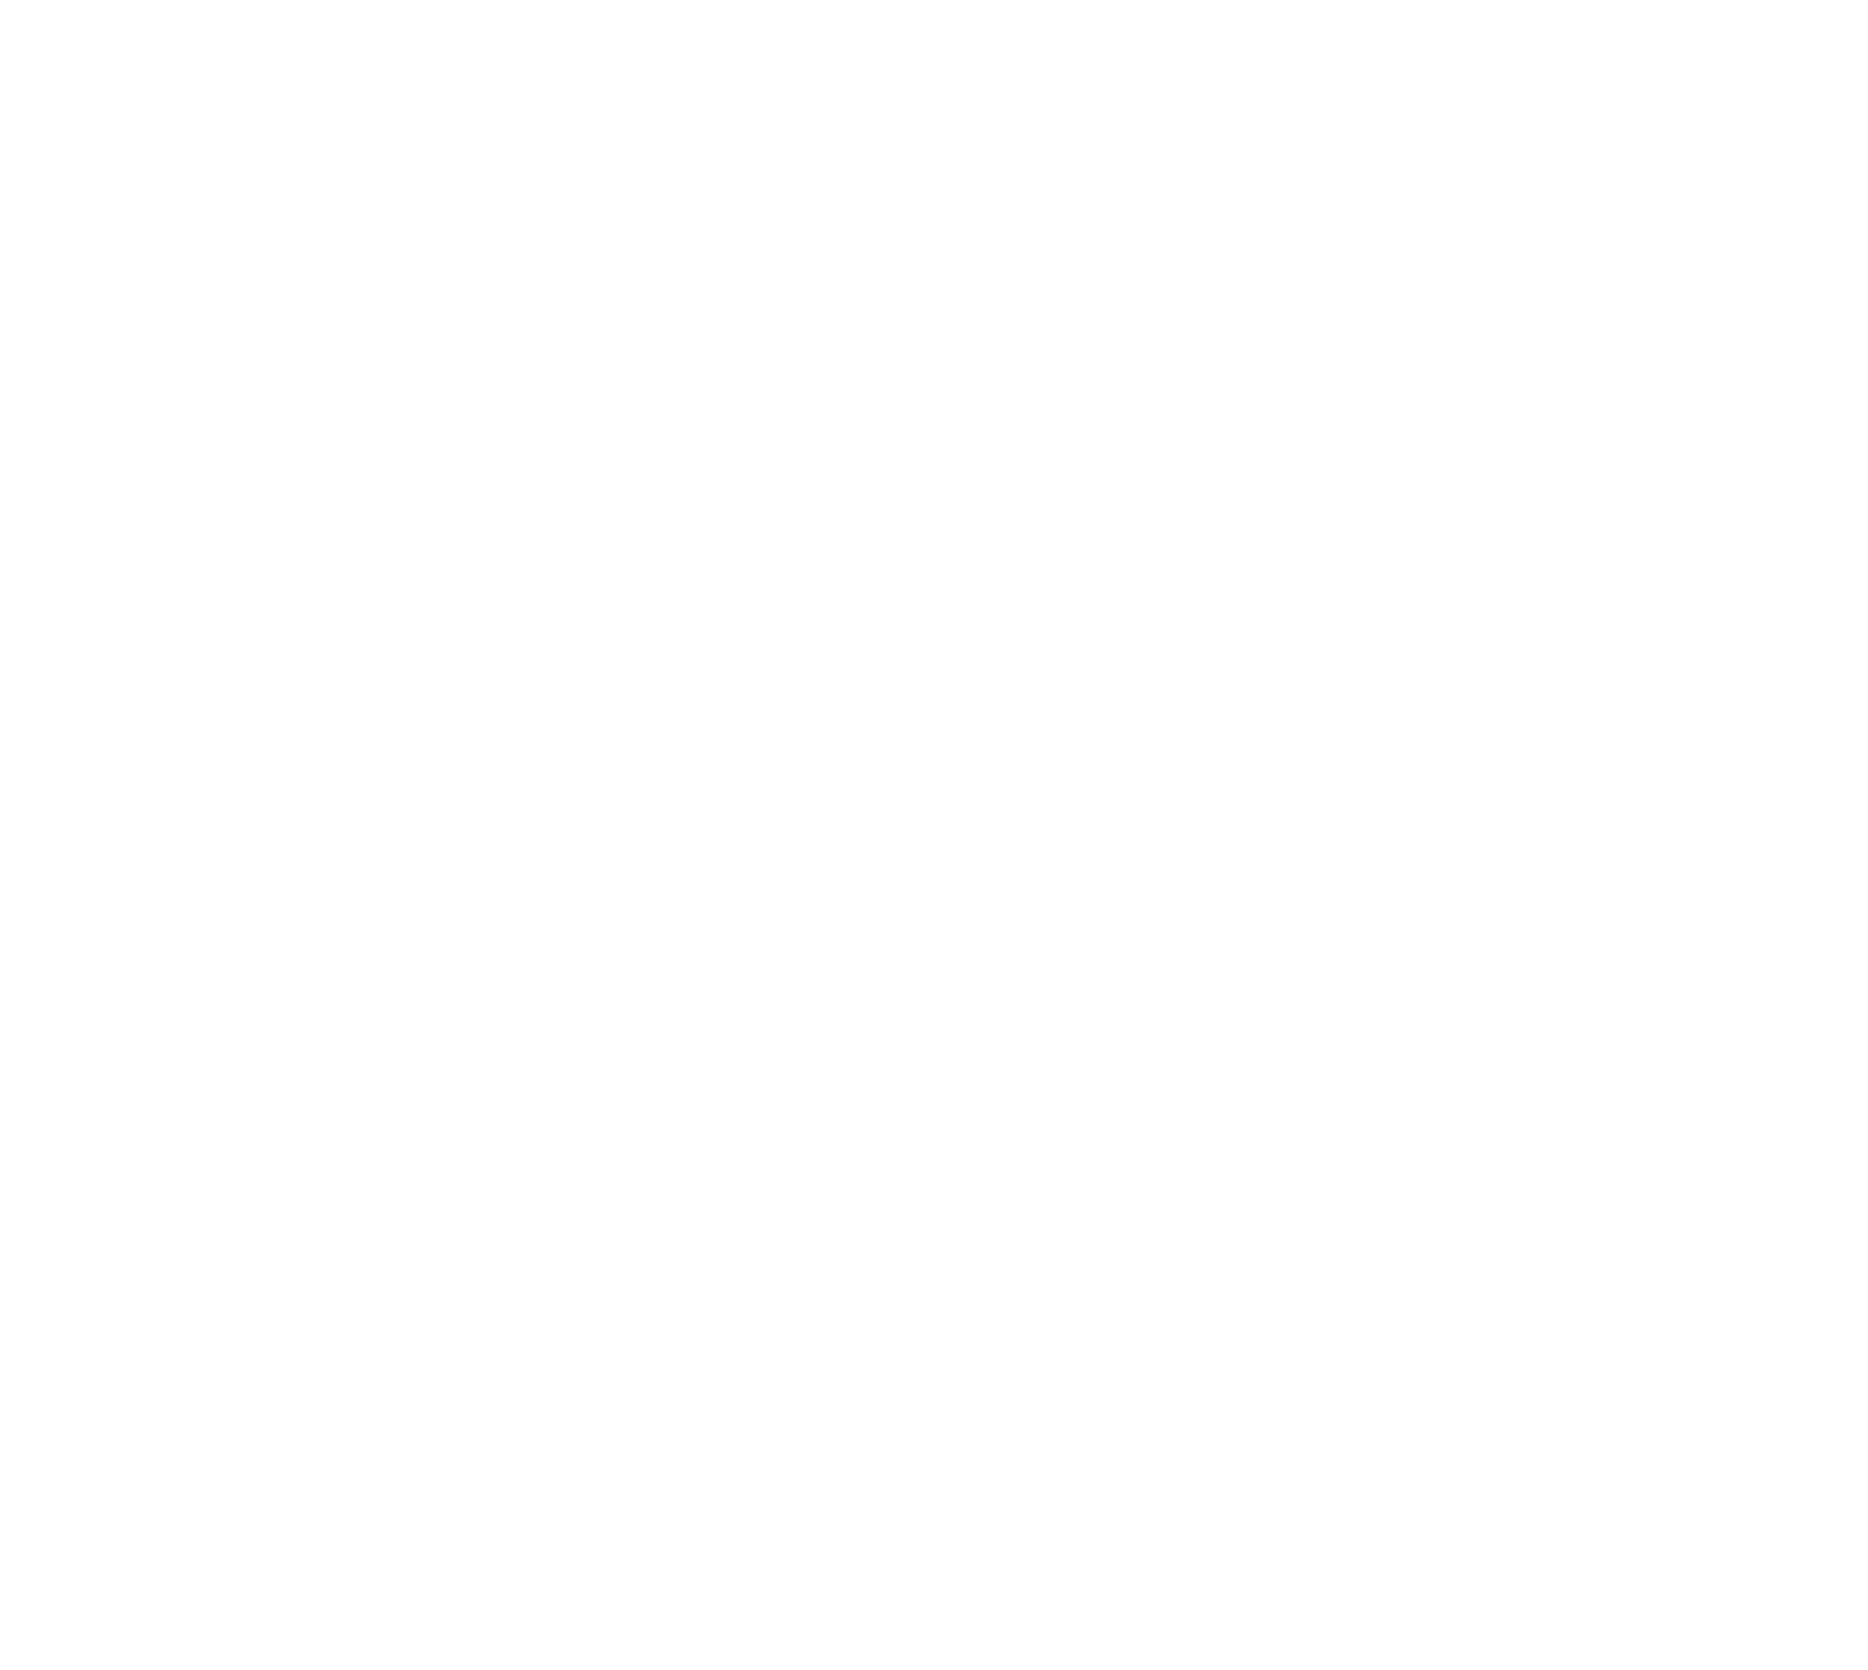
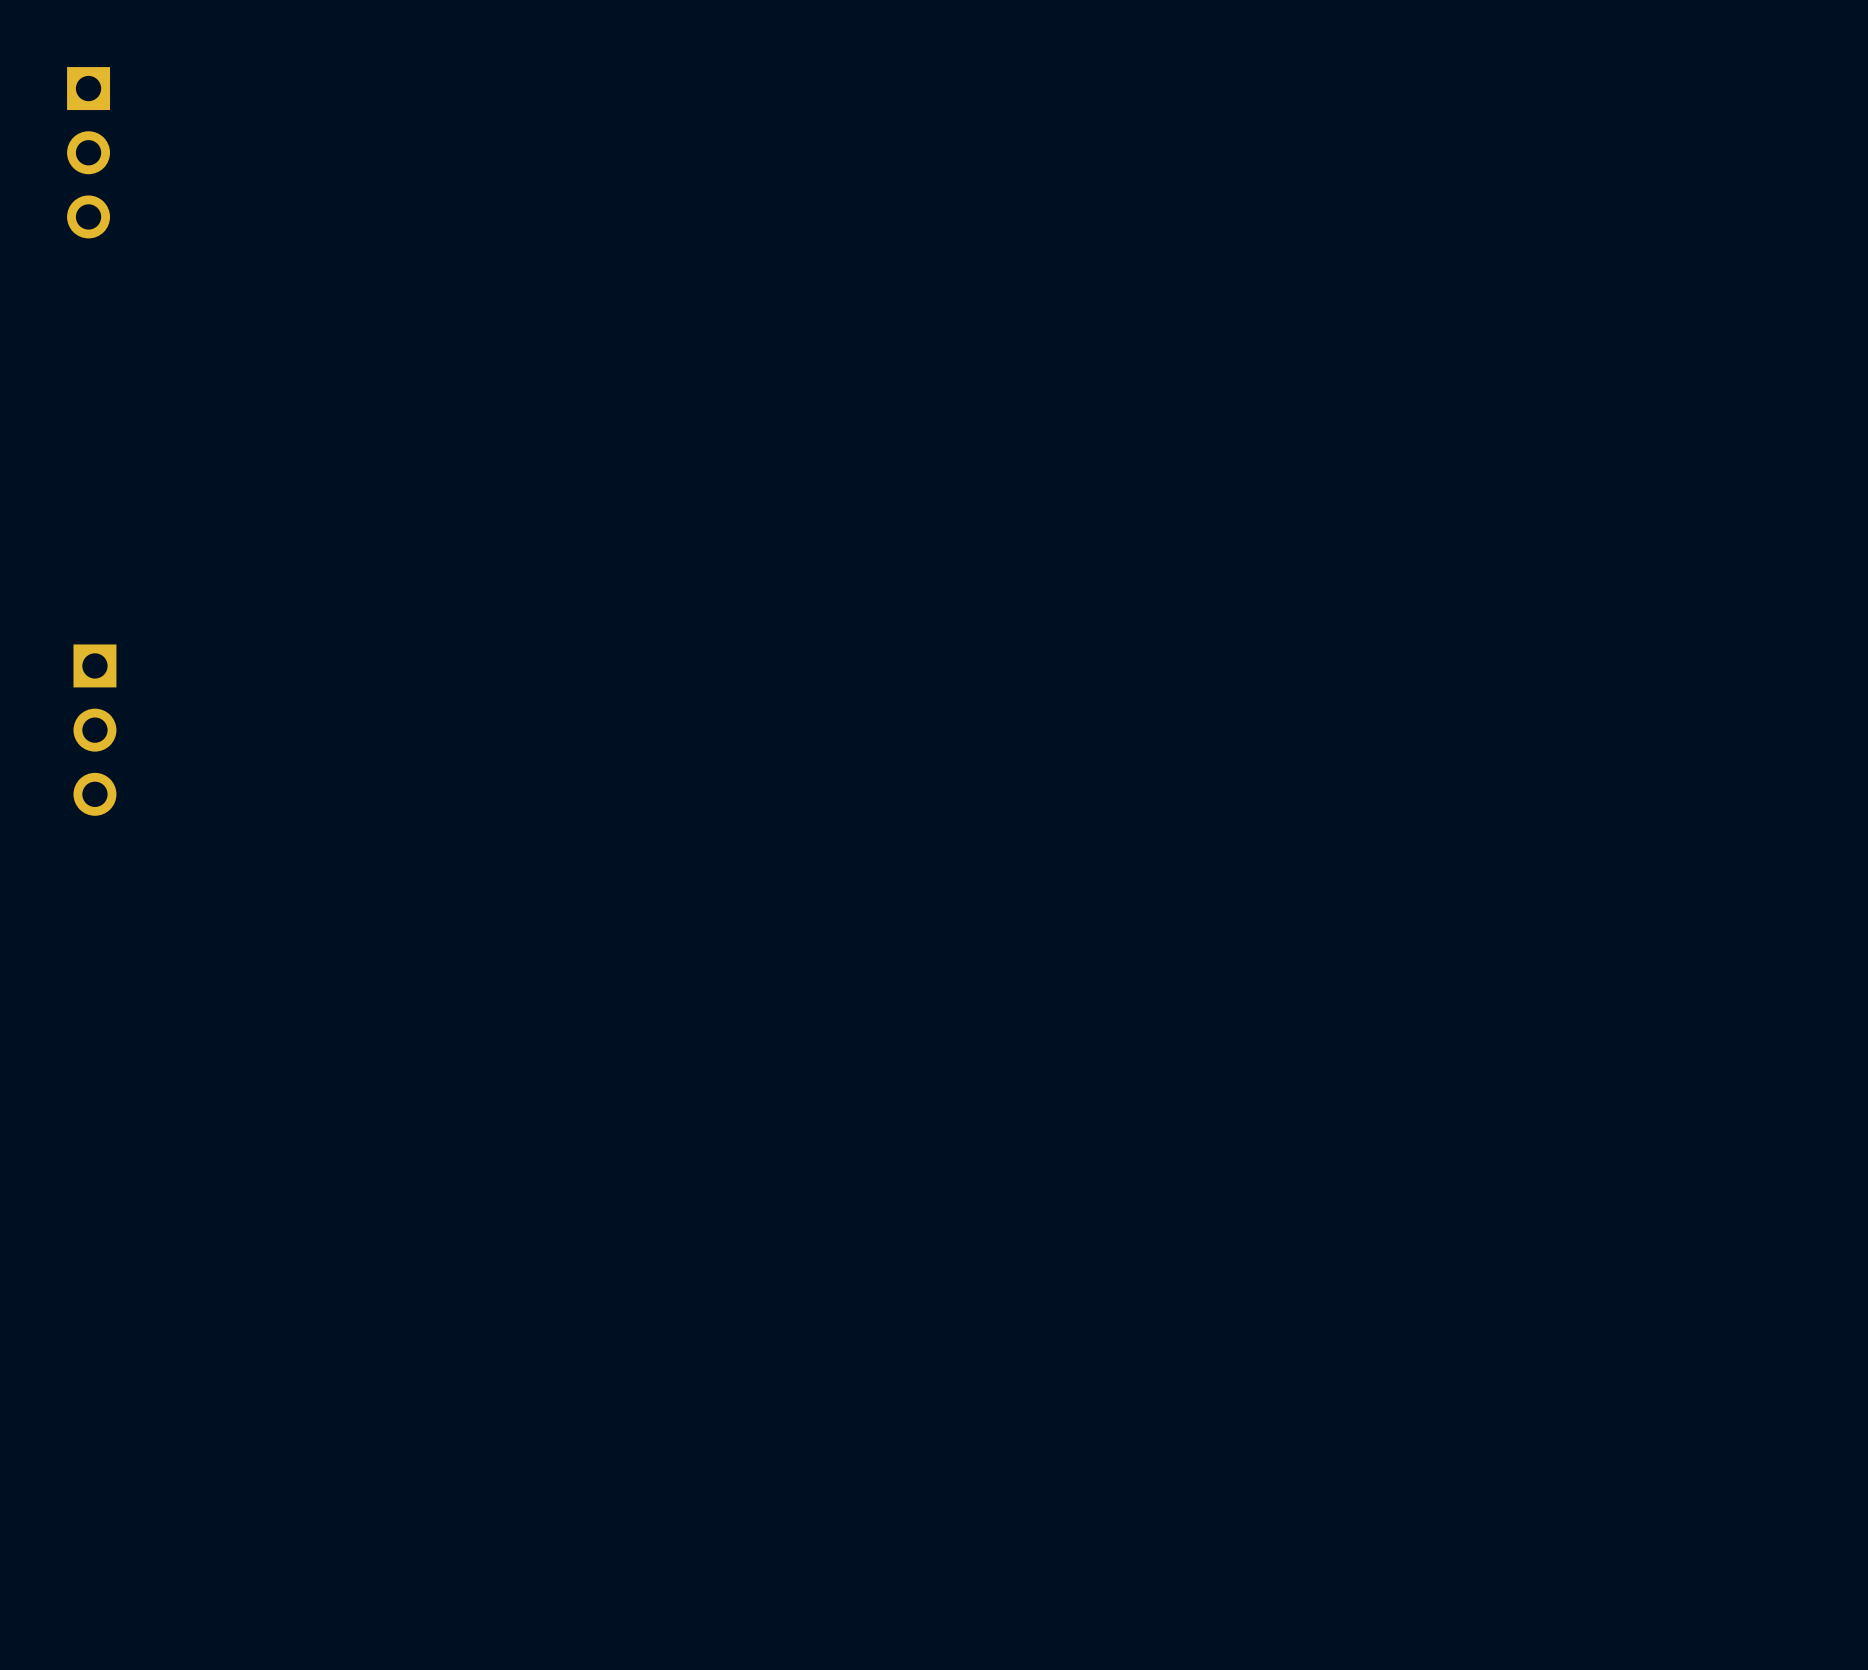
part: none -> (88, 152)
part: none -> (94, 730)

